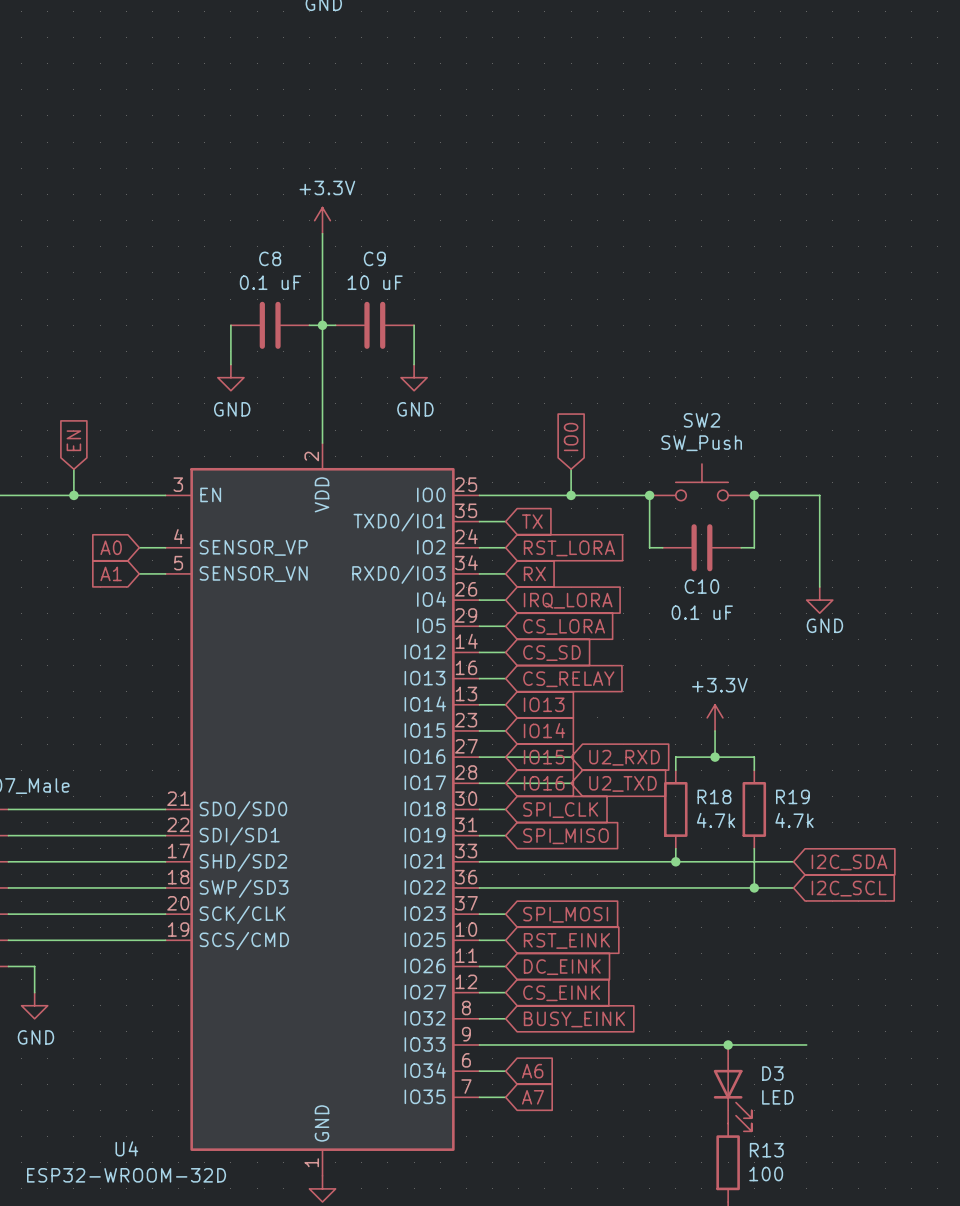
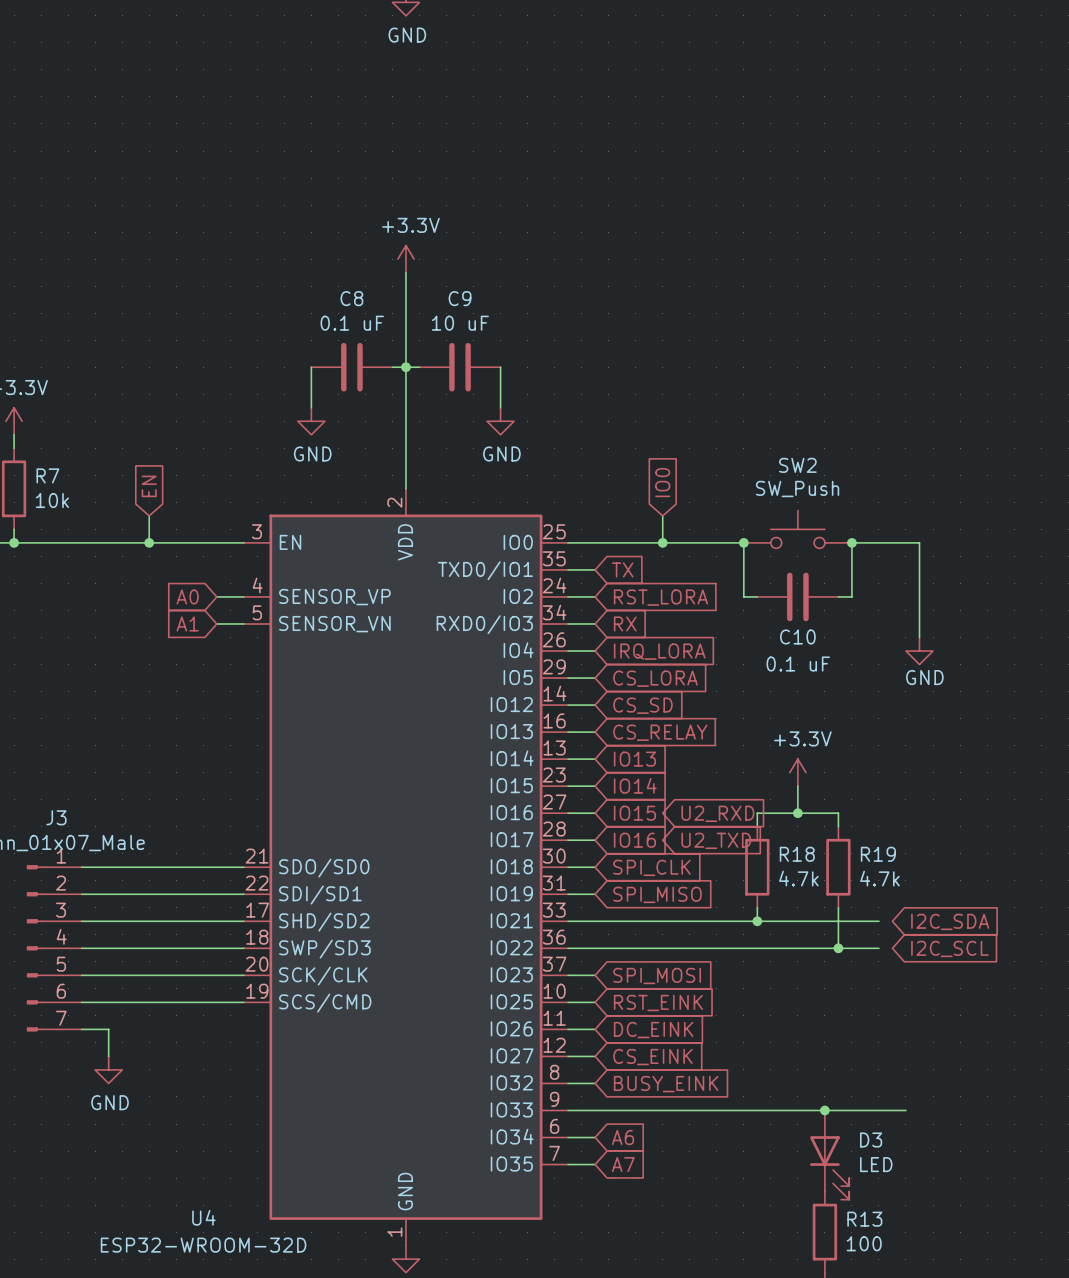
power symbol position: +3.3V (715, 717) -> +3.3V (797, 772)
wire: (715, 730) (715, 757) -> (797, 786) (797, 813)
wire: (505, 757) (571, 757) -> none
wire: (675, 757) (675, 770) -> (770, 813) (757, 813) (757, 826)
junction position: (715, 757) -> (797, 813)
wire: (741, 757) (754, 757) (754, 770) -> (838, 813) (838, 826)
wire: (505, 783) (571, 783) -> none
R18 position: (675, 809) -> (757, 867)
R19 position: (754, 809) -> (838, 867)
wire: (675, 848) (675, 861) -> (757, 907) (757, 921)
wire: (754, 848) (754, 887) -> (838, 907) (838, 948)
junction position: (675, 861) -> (757, 921)
wire: (780, 861) (793, 861) -> none
junction position: (754, 887) -> (838, 948)
wire: (780, 887) (793, 887) -> none

